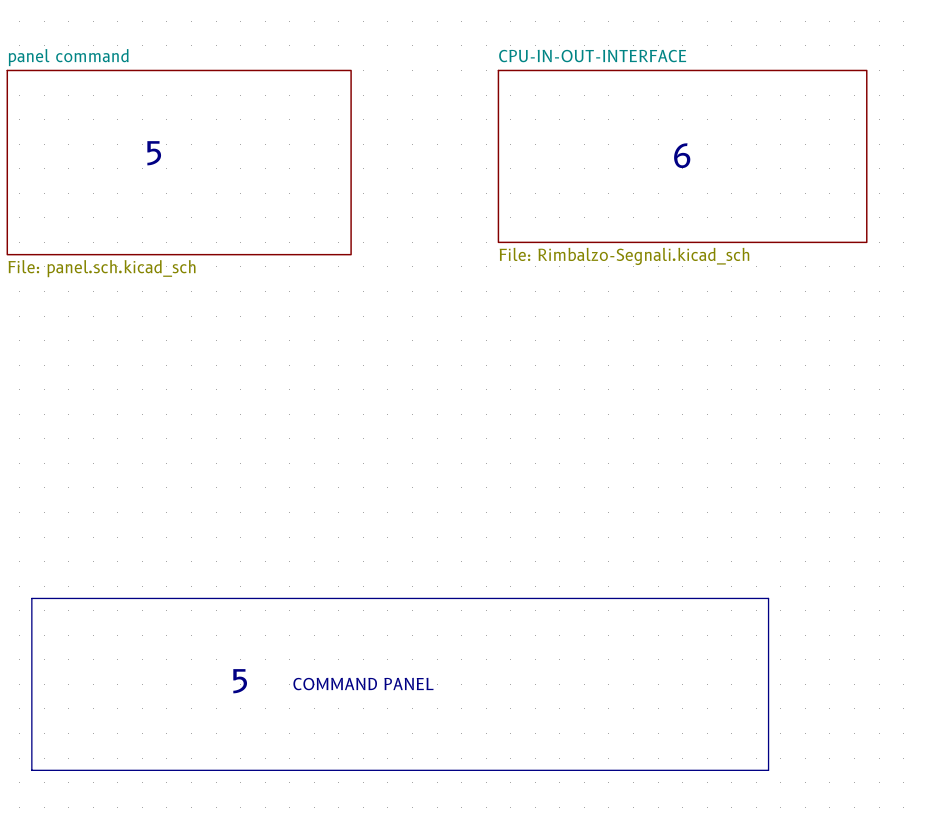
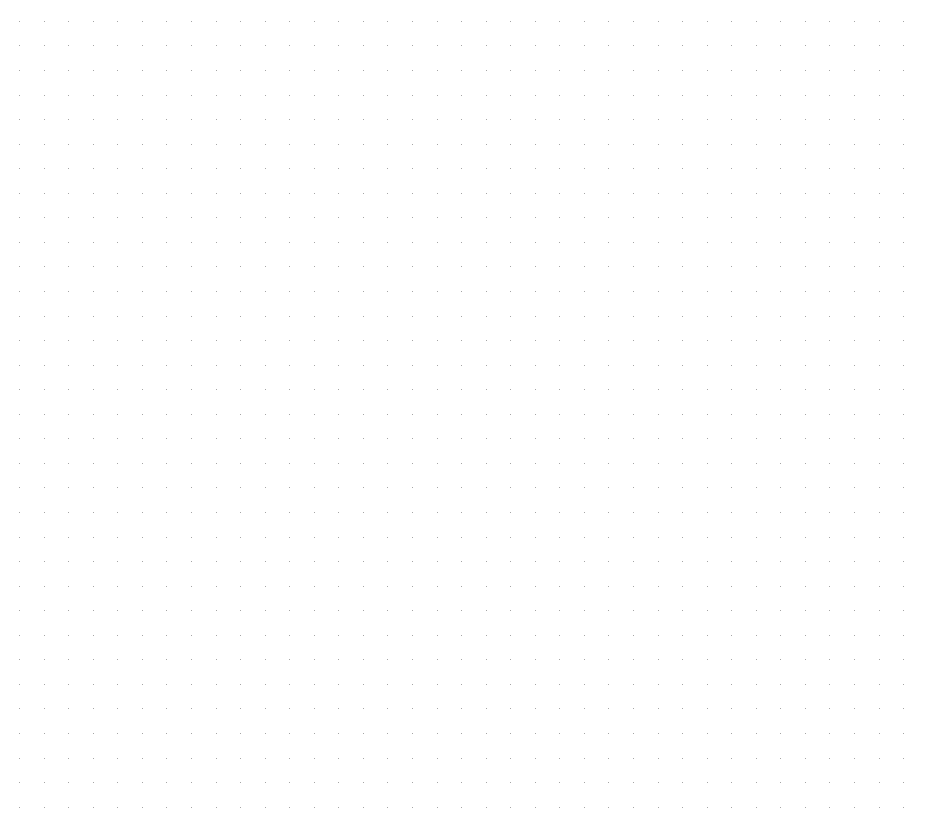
text: 5 (154, 153) -> none
text: 6 (682, 155) -> none
sheet CPU-IN-OUT-INTERFACE: File: Rimbalzo-Segnali.kicad_sch (682, 156) -> none
sheet panel command: File: panel.sch.kicad_sch (179, 162) -> none
line: (31, 598) (768, 598) (768, 770) (31, 770) (31, 598) -> none
text: 5 (240, 681) -> none
text: COMMAND PANEL (363, 684) -> none

